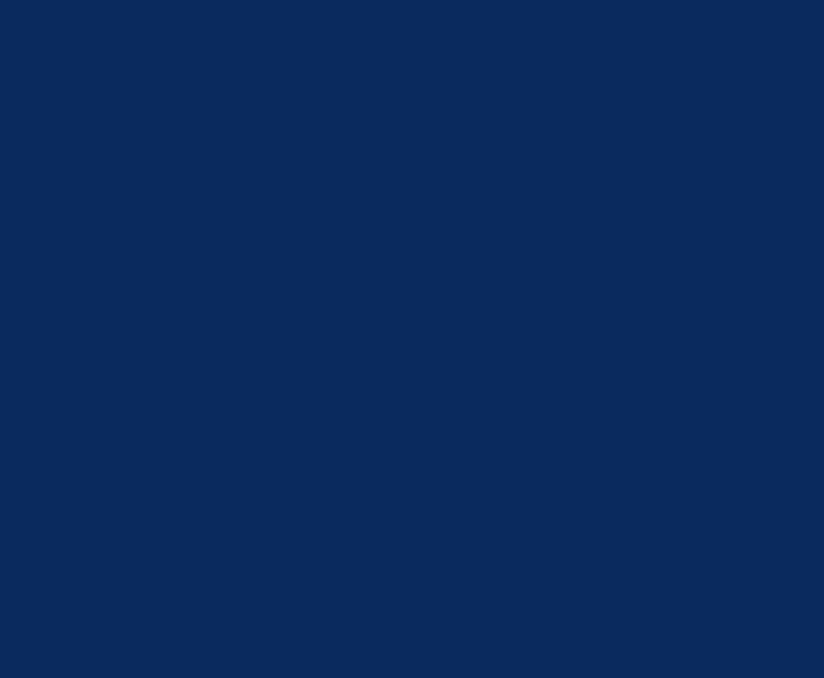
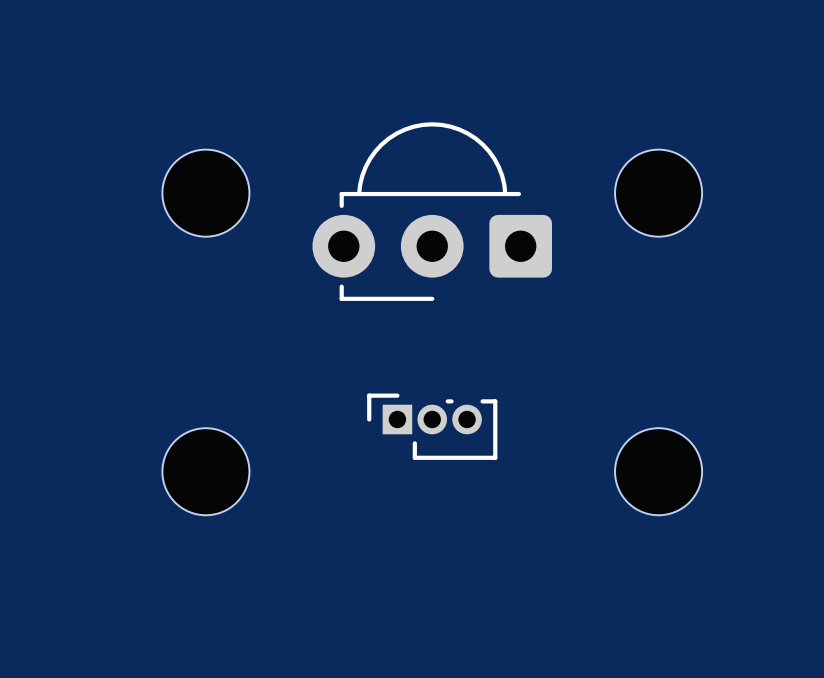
part: none -> (205, 193)
part: none -> (658, 193)
part: none -> (432, 211)
part: none -> (432, 426)
part: none -> (205, 471)
part: none -> (658, 471)

